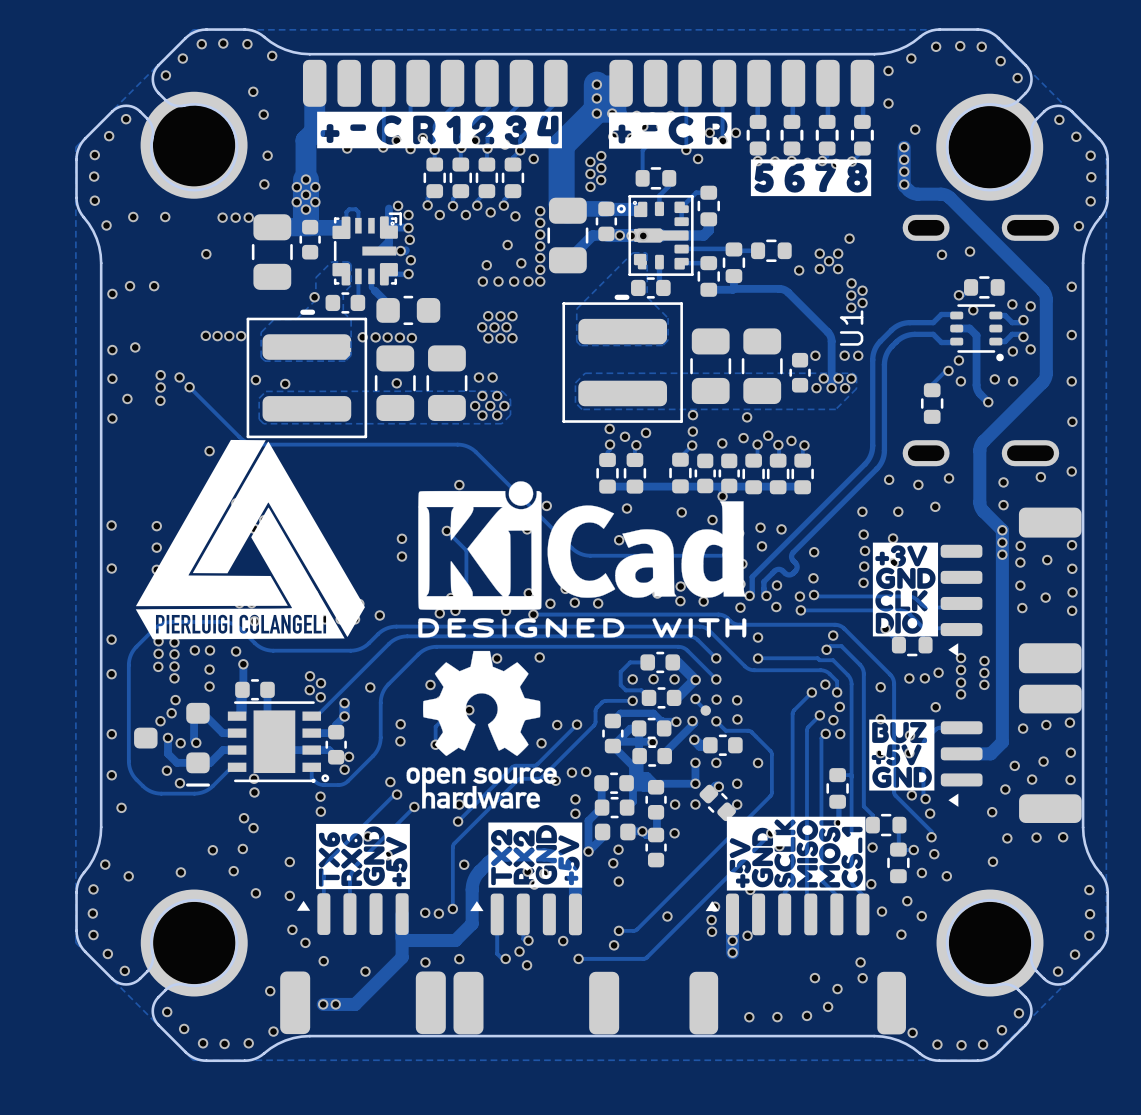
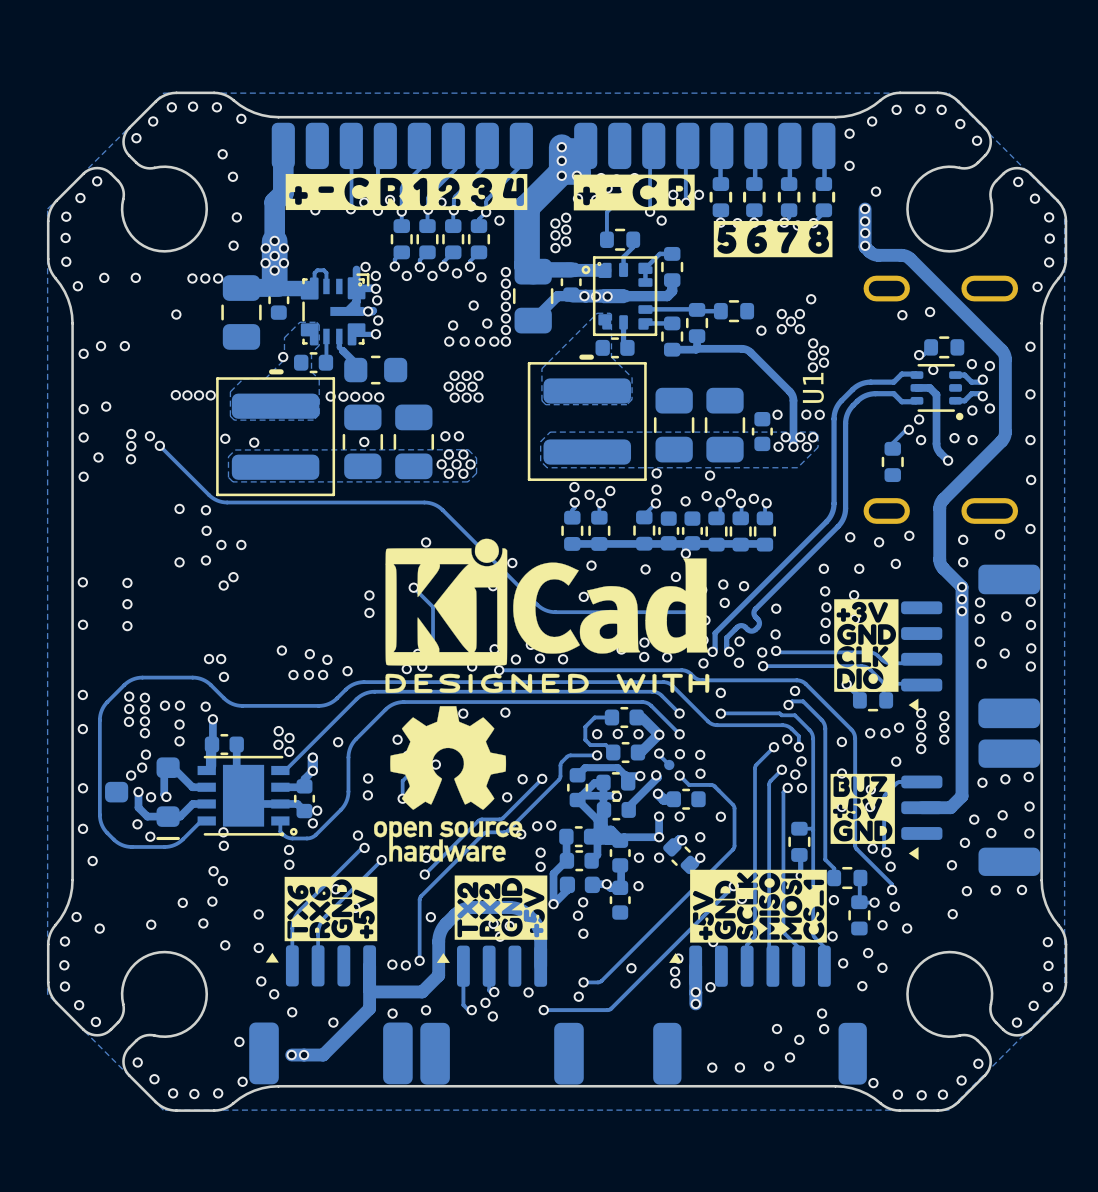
part: (194, 145) -> none
part: (989, 147) -> none
drawing: [135, 439, 365, 640] -> none
part: (194, 943) -> none
part: (990, 943) -> none

